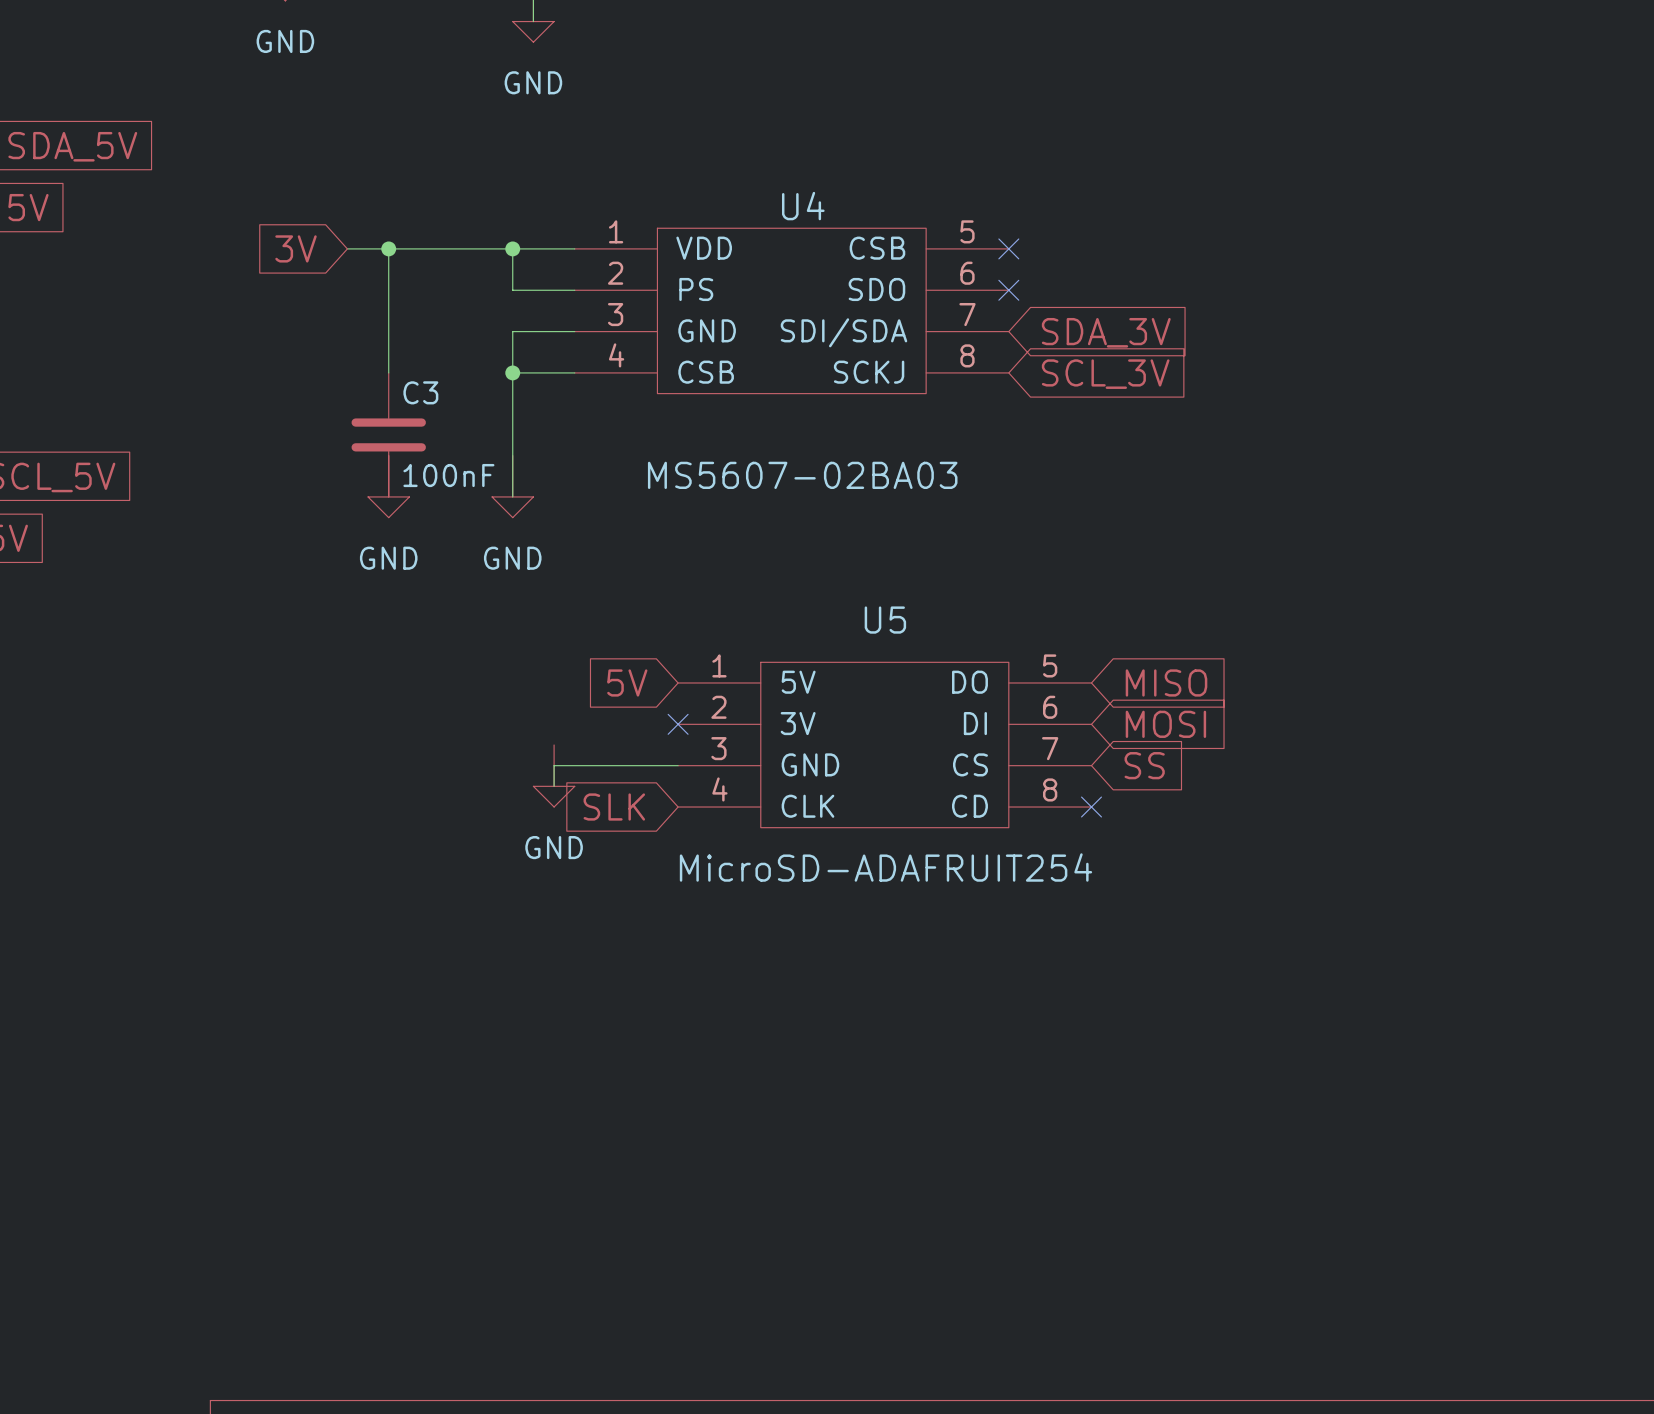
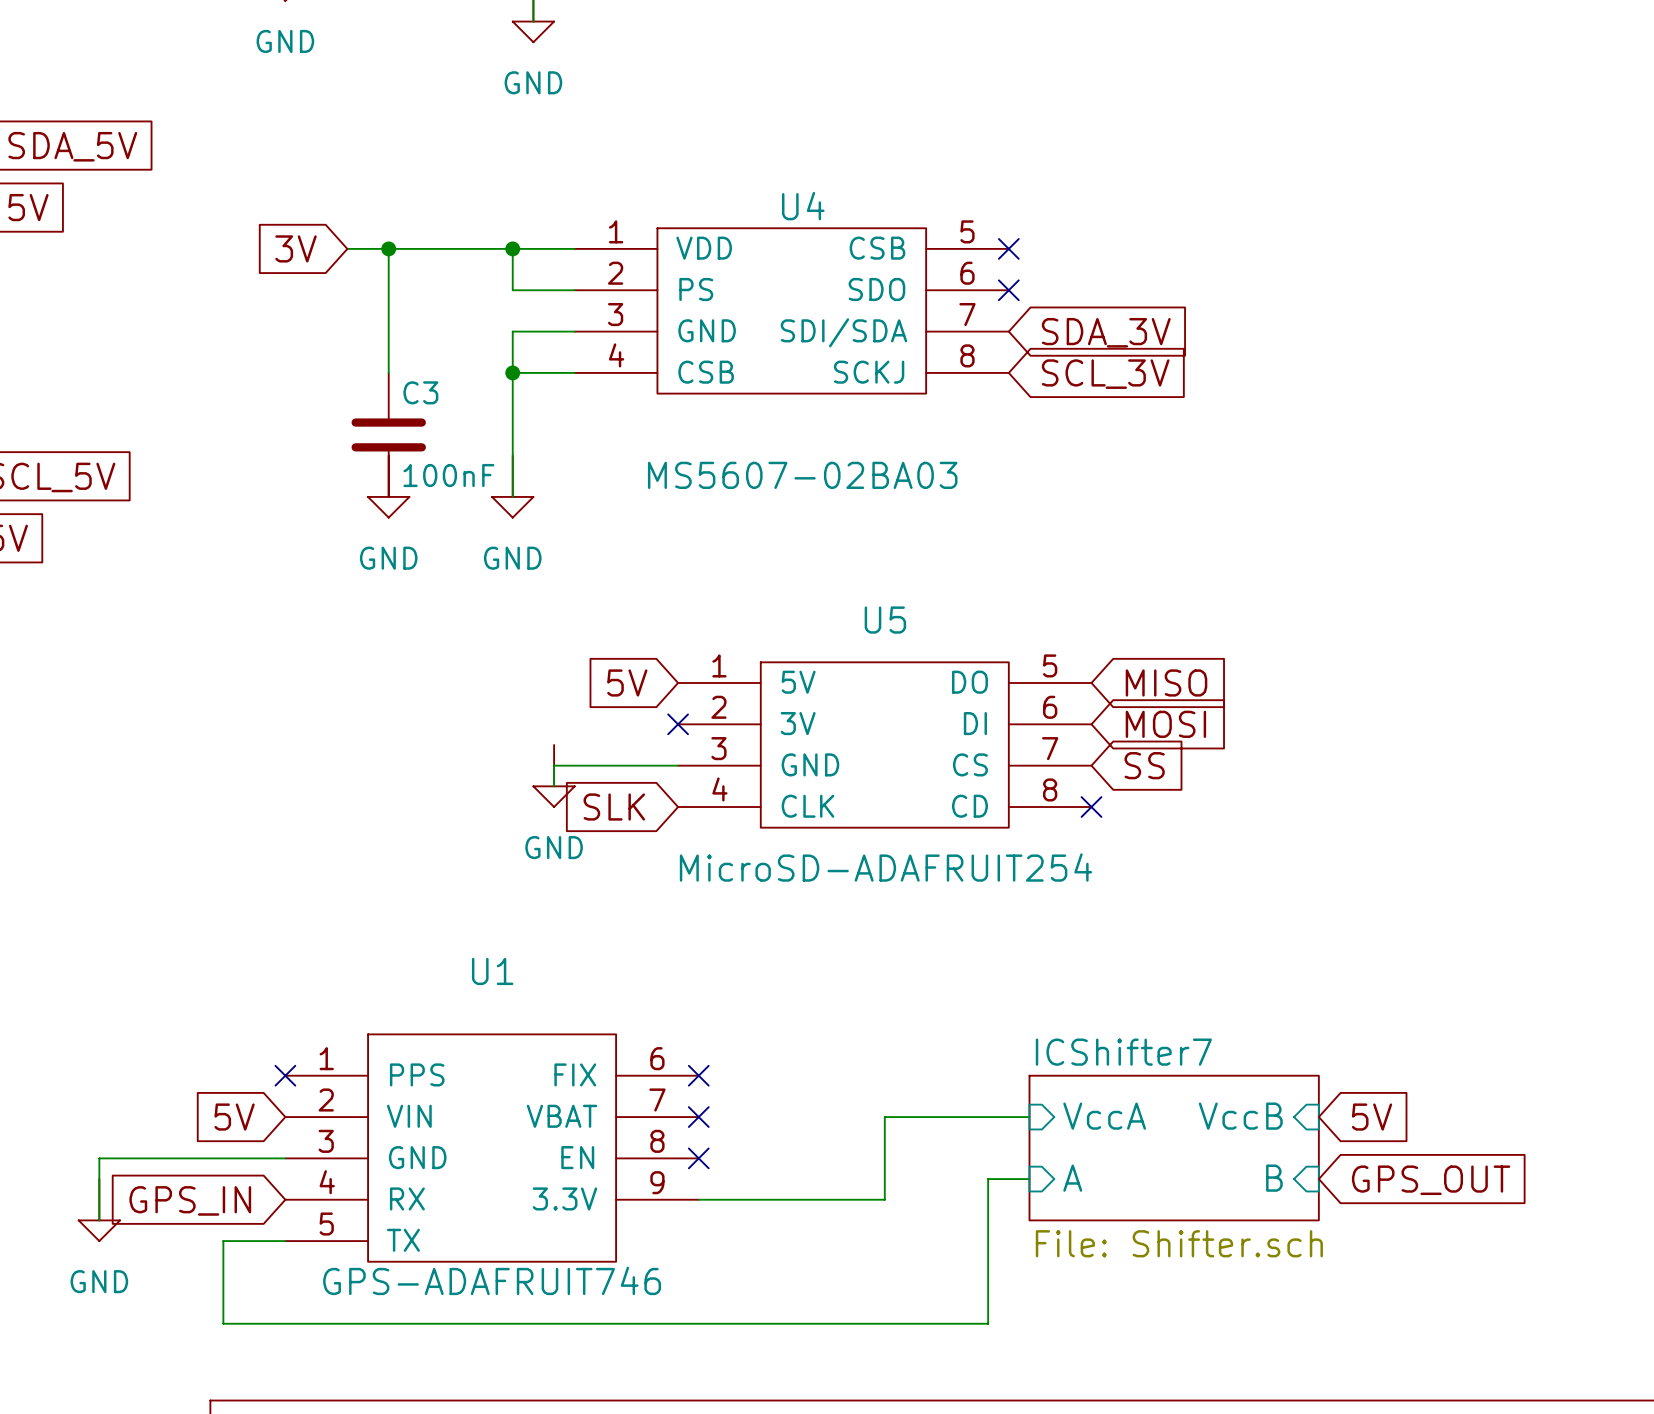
no-connect mark: none -> (285, 1075)
no-connect mark: none -> (698, 1075)
sheet pin: none -> VccA (1104, 1116)
sheet pin: none -> VccB (1240, 1116)
global label: none -> 5V (234, 1117)
no-connect mark: none -> (698, 1117)
wire: none -> (1029, 1117) (884, 1117) (884, 1199) (698, 1199)
global label: none -> 5V (1372, 1117)
U1: none -> GPS-ADAFRUIT746 (492, 1148)
sheet ICShifter7: none -> File: Shifter.sch (1174, 1148)
wire: none -> (285, 1158) (99, 1158) (99, 1220)
no-connect mark: none -> (698, 1158)
sheet pin: none -> A (1072, 1178)
sheet pin: none -> B (1274, 1178)
wire: none -> (1029, 1179) (988, 1179) (988, 1323) (223, 1323) (223, 1241) (285, 1241)
global label: none -> GPS_OUT (1431, 1180)
global label: none -> GPS_IN (190, 1200)
power symbol: none -> GND (99, 1210)

